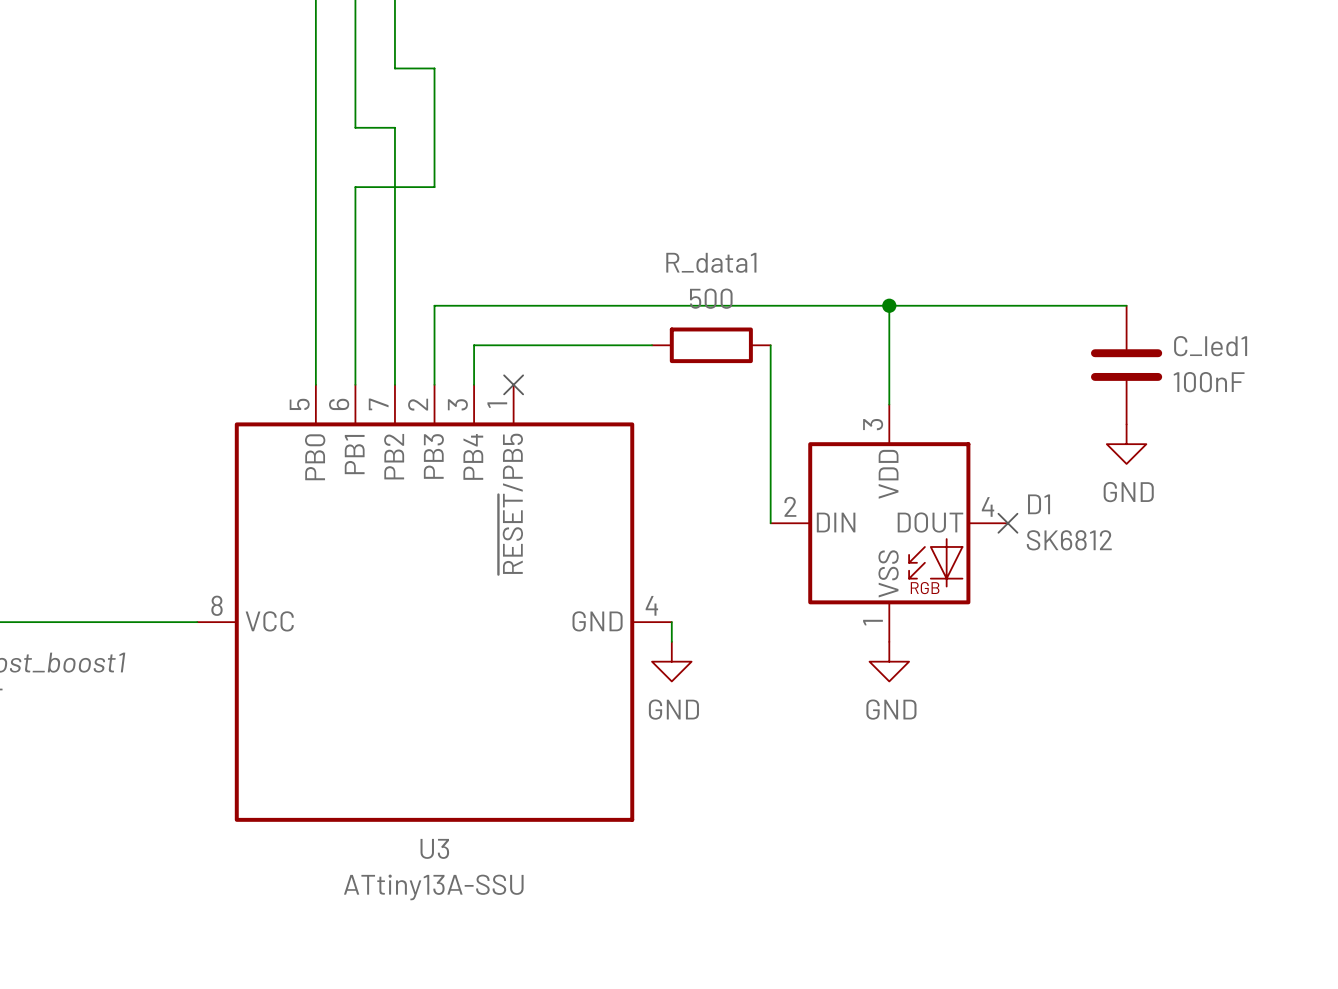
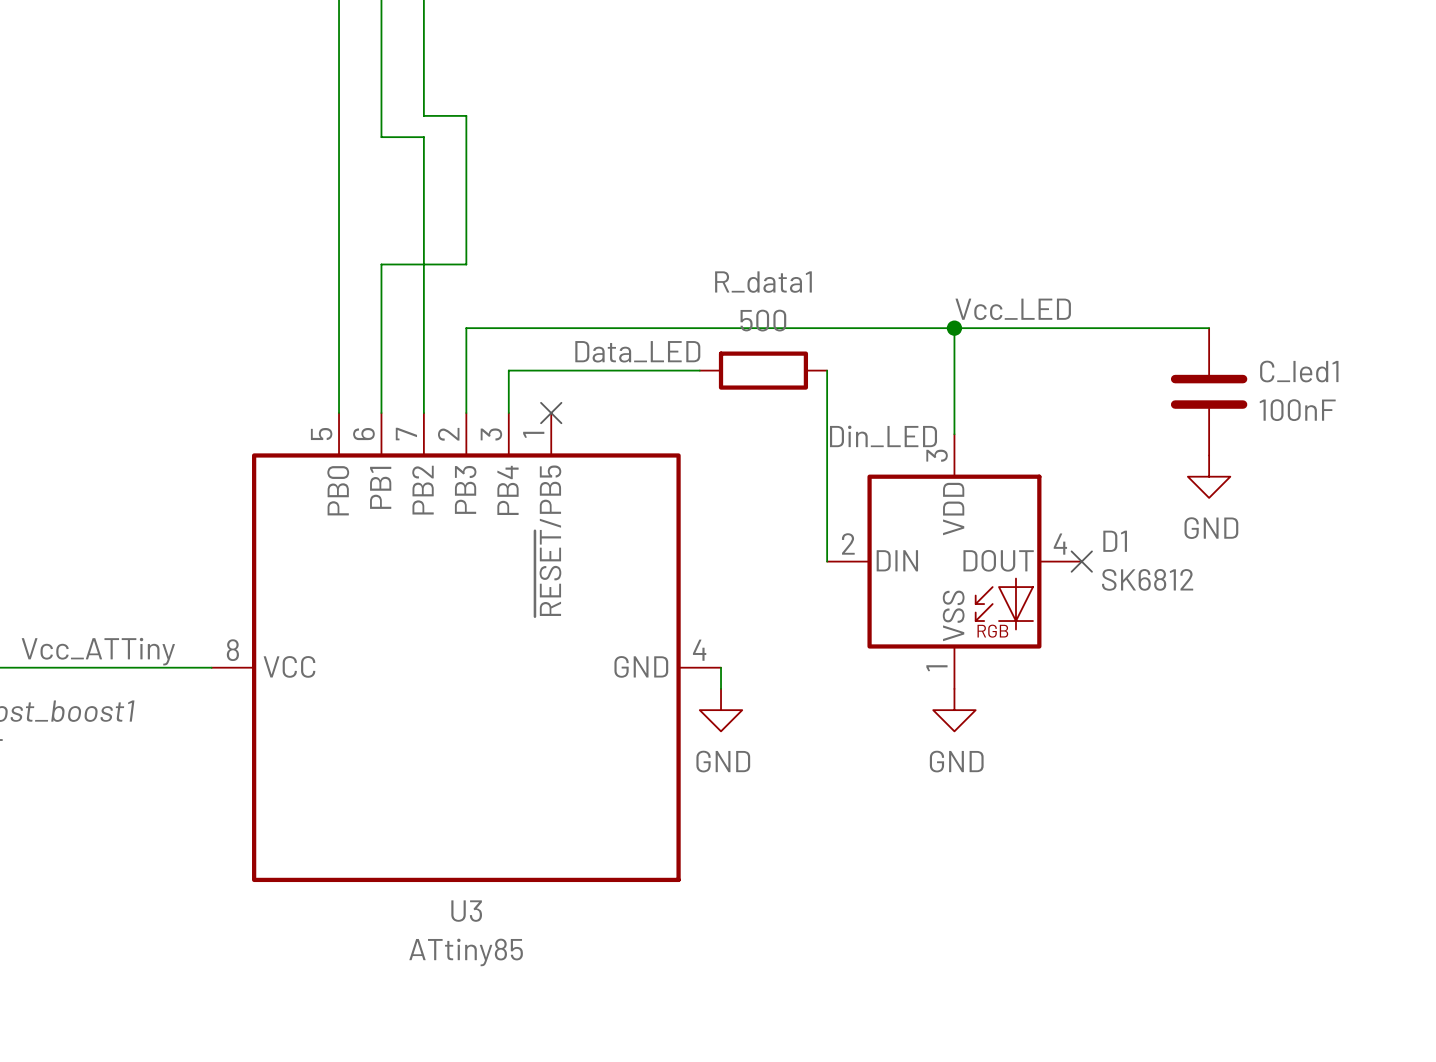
wire: (394, 68) (434, 68) (434, 108) -> (423, 73) (423, 115) (466, 115)
wire: (434, 187) (355, 187) (355, 246) -> (466, 200) (466, 264) (381, 264)
label: none -> Vcc_LED (1013, 309)
label: none -> Data_LED (637, 351)
label: none -> Din_LED (883, 436)
label: none -> Vcc_ATTiny (98, 651)
U3 value: ATtiny13A-SSU (433, 887) -> ATtiny85 (466, 952)

